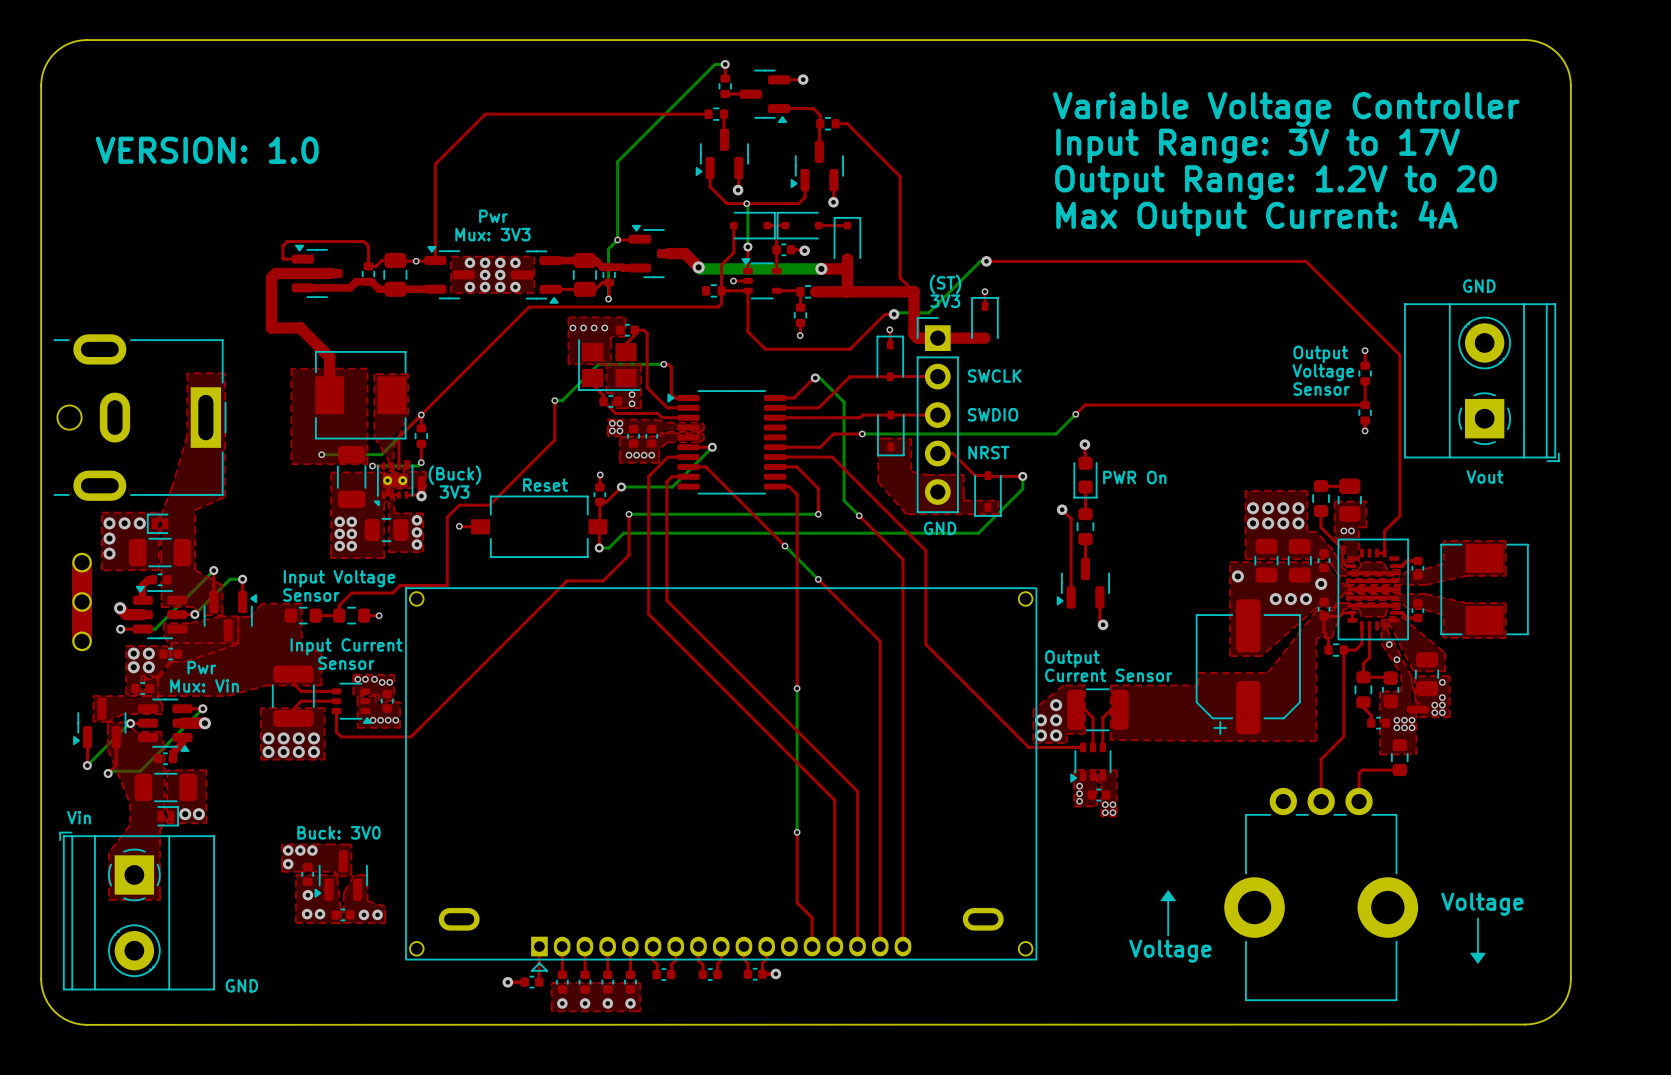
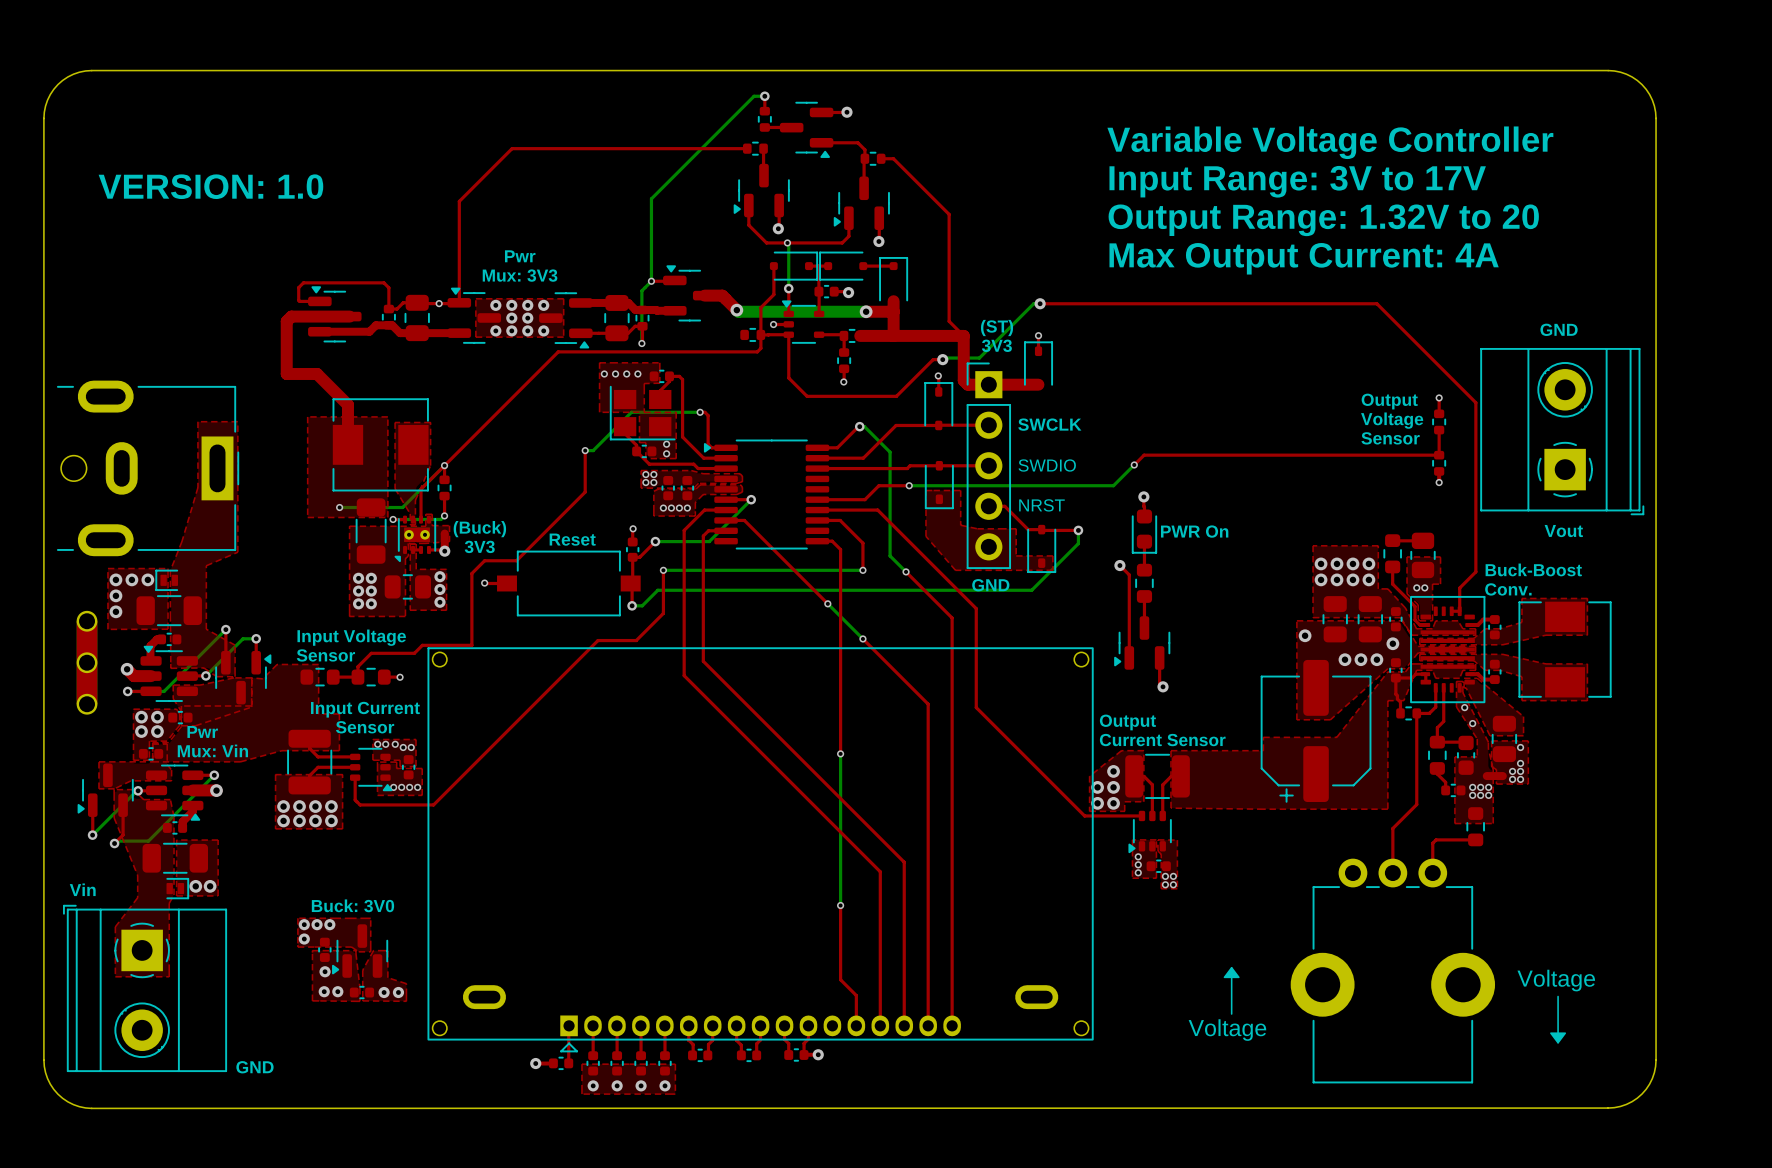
text: Output Range: 1.2V to 20 (1275, 182) -> Output Range: 1.32V to 20 (1323, 220)
text: none -> Buck-Boost (1533, 569)
text: none -> Conv. (1508, 589)

